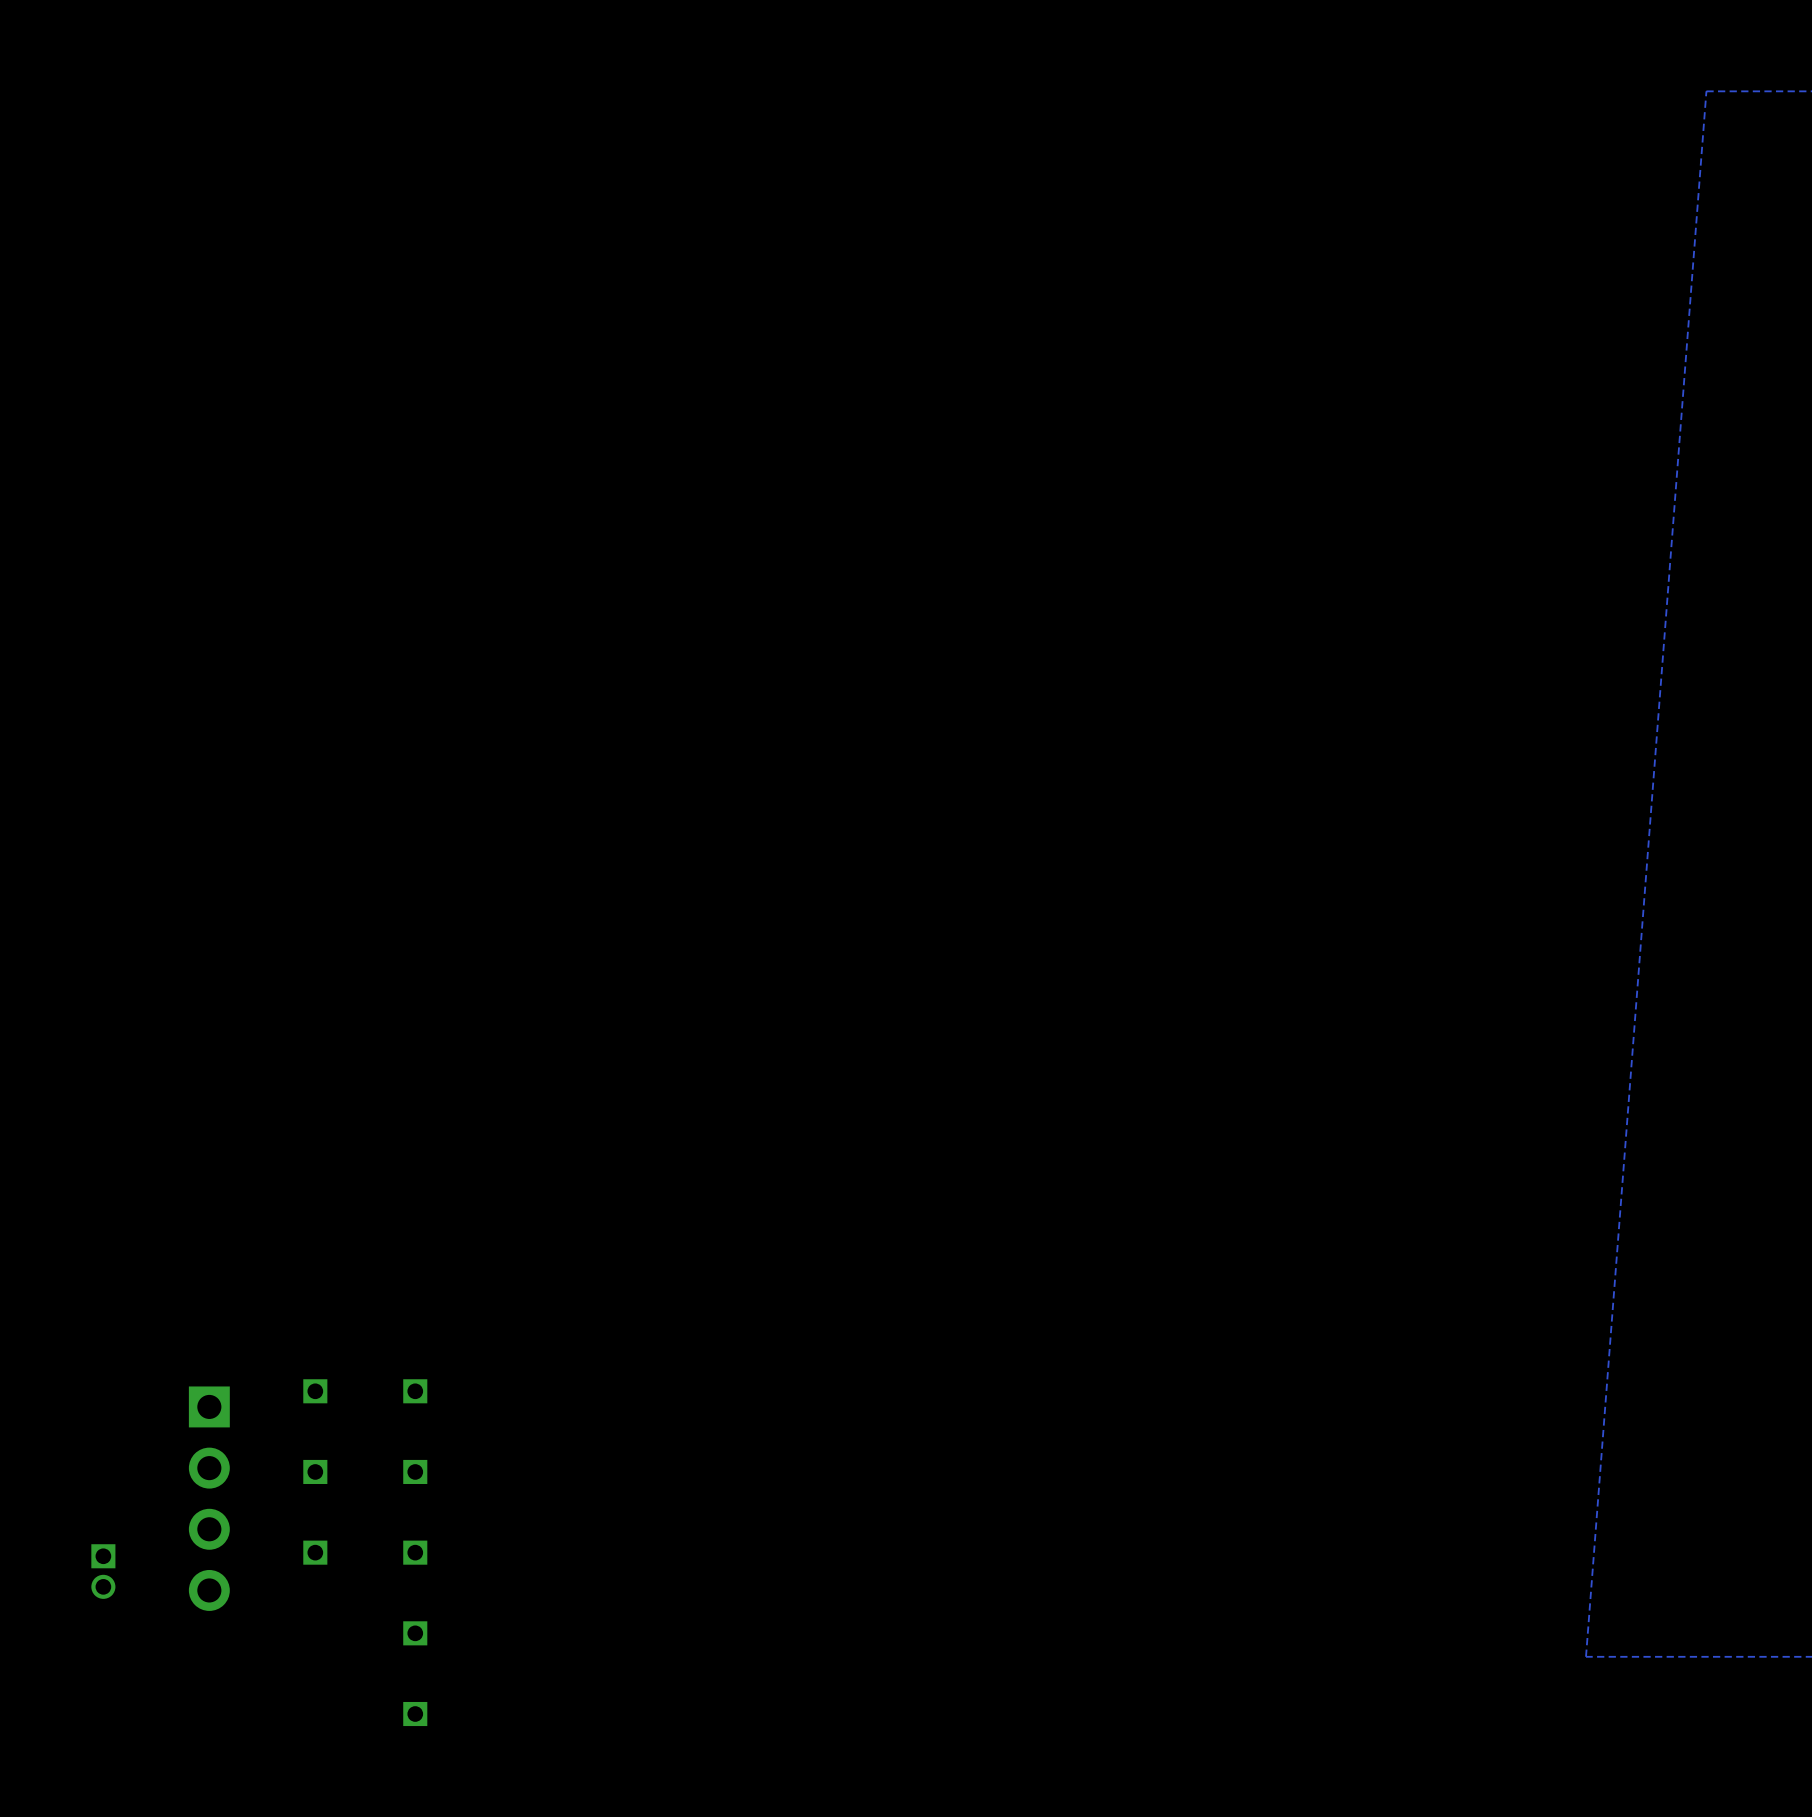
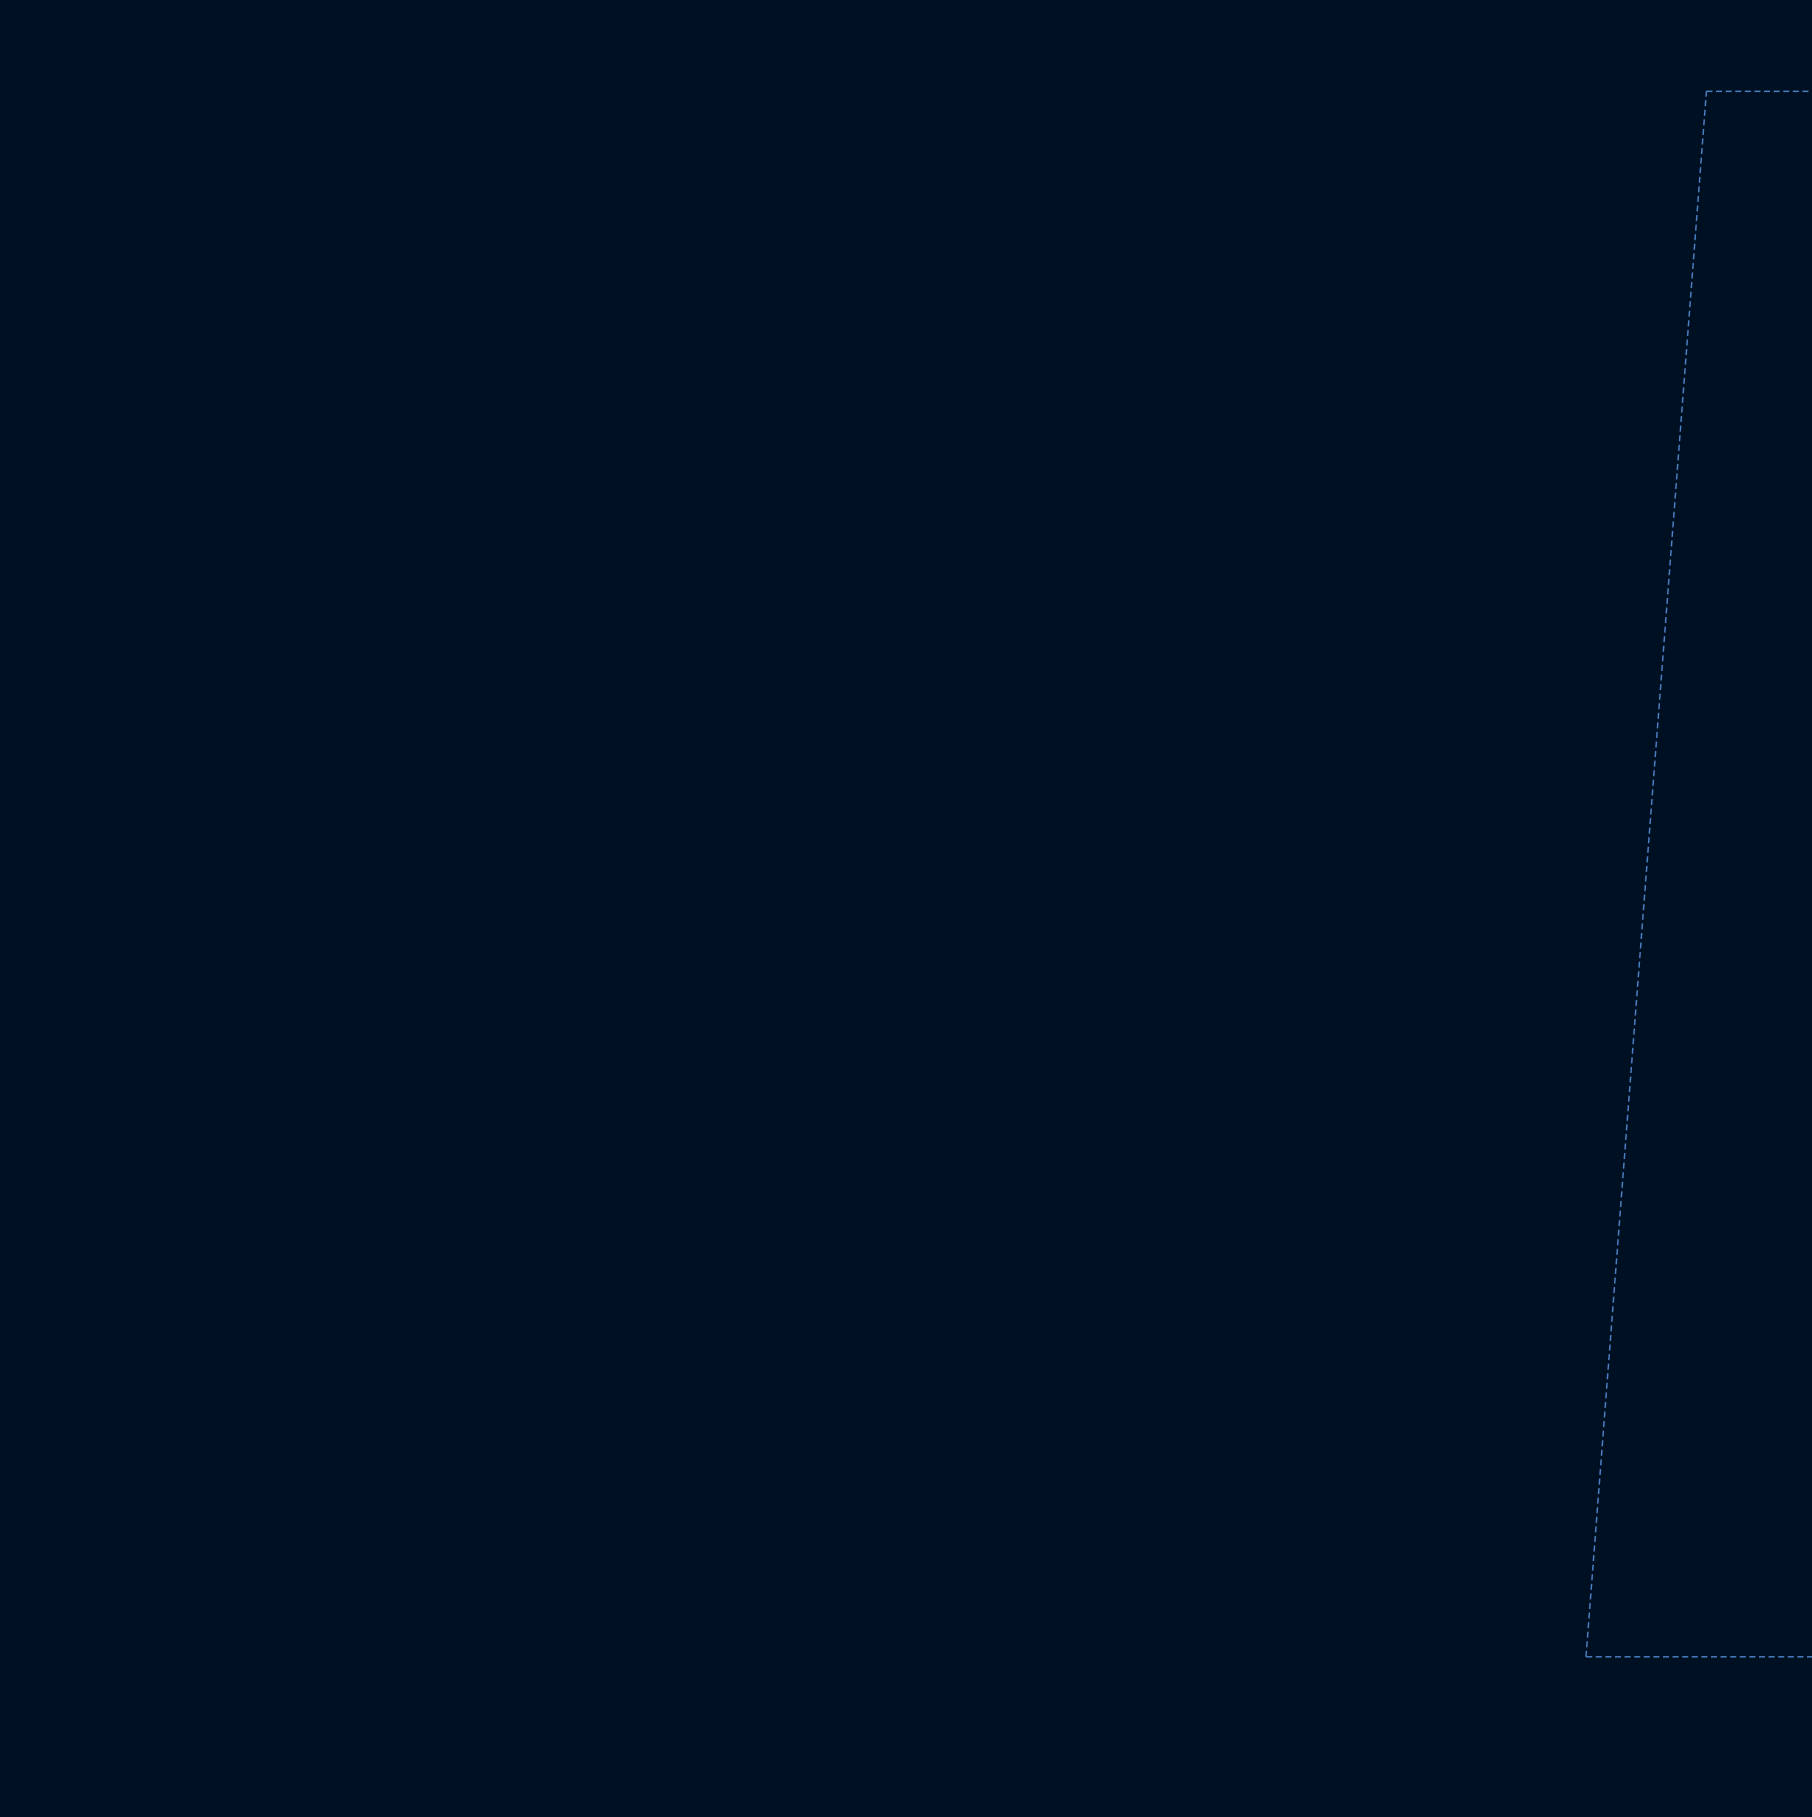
part: (315, 1391) -> none
part: (415, 1391) -> none
part: (315, 1471) -> none
part: (415, 1471) -> none
part: (209, 1498) -> none
part: (315, 1552) -> none
part: (415, 1552) -> none
part: (103, 1571) -> none
part: (415, 1633) -> none
part: (415, 1714) -> none

